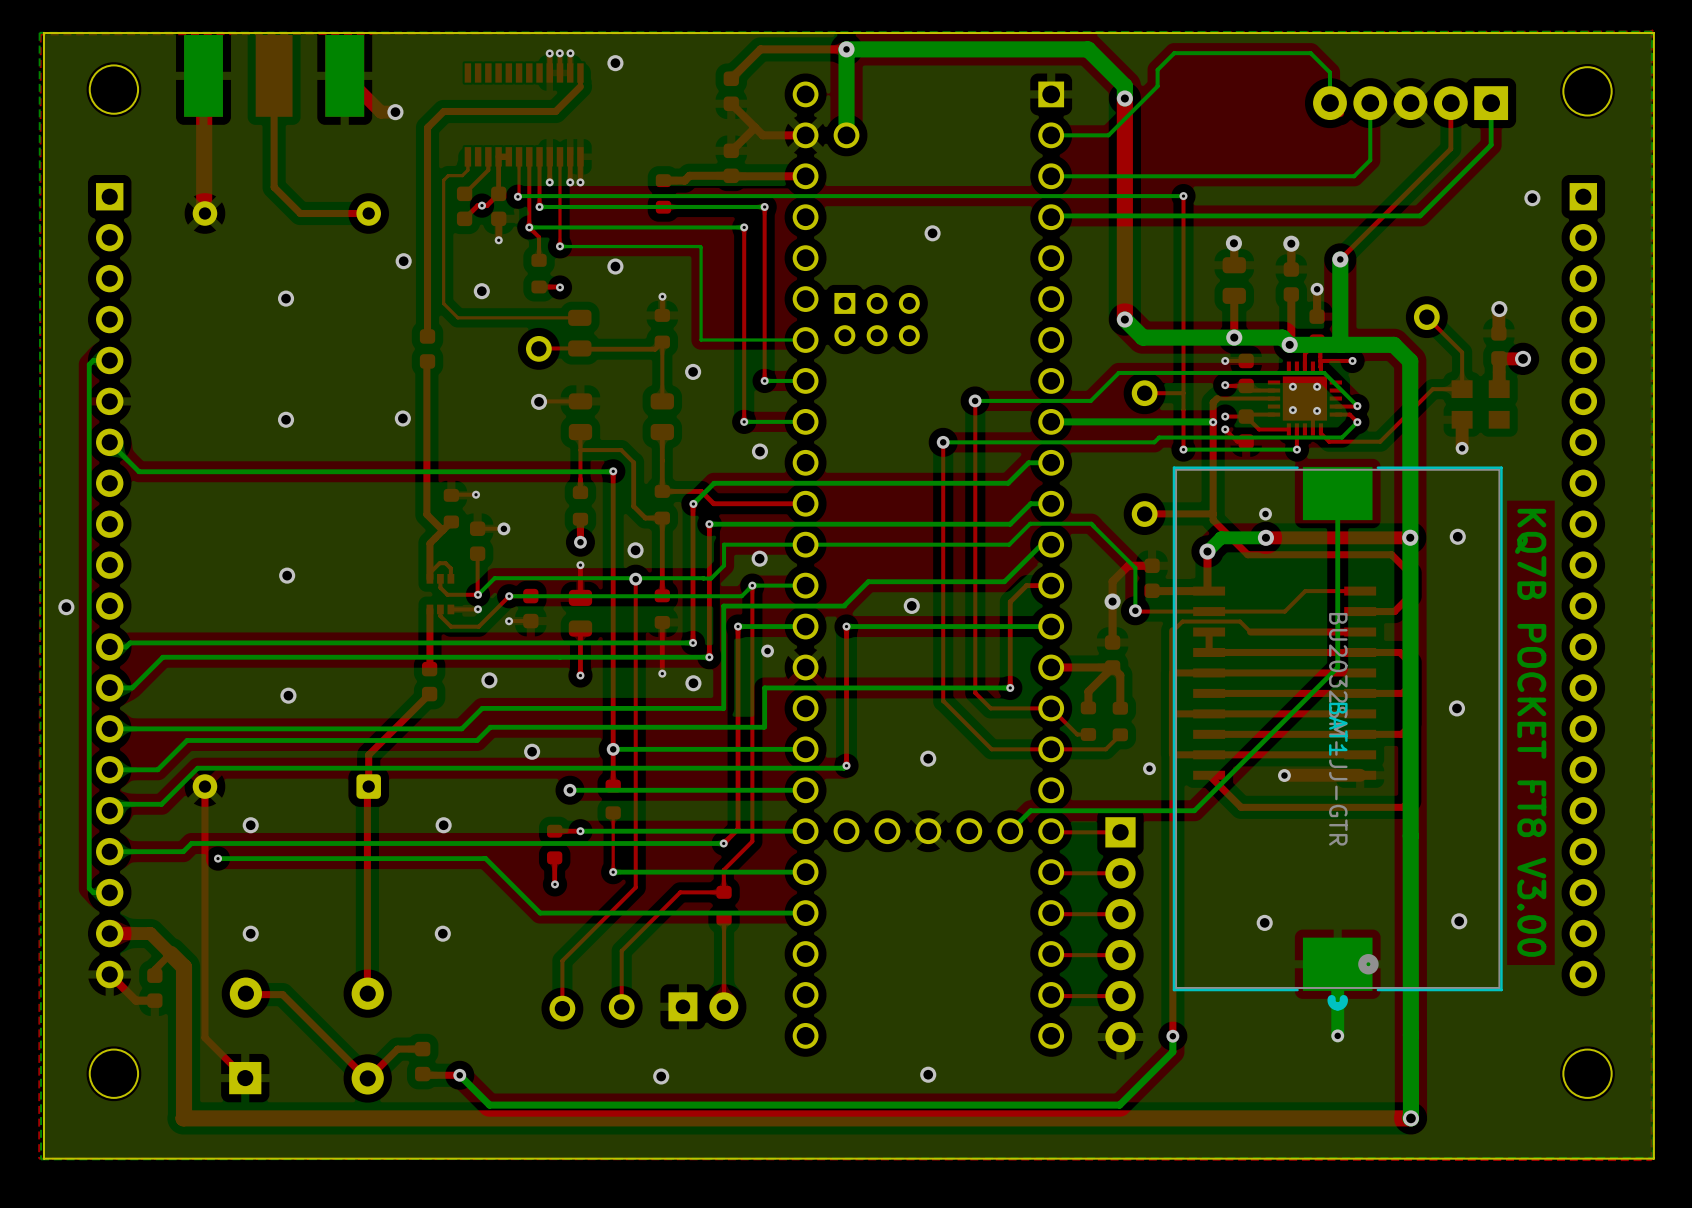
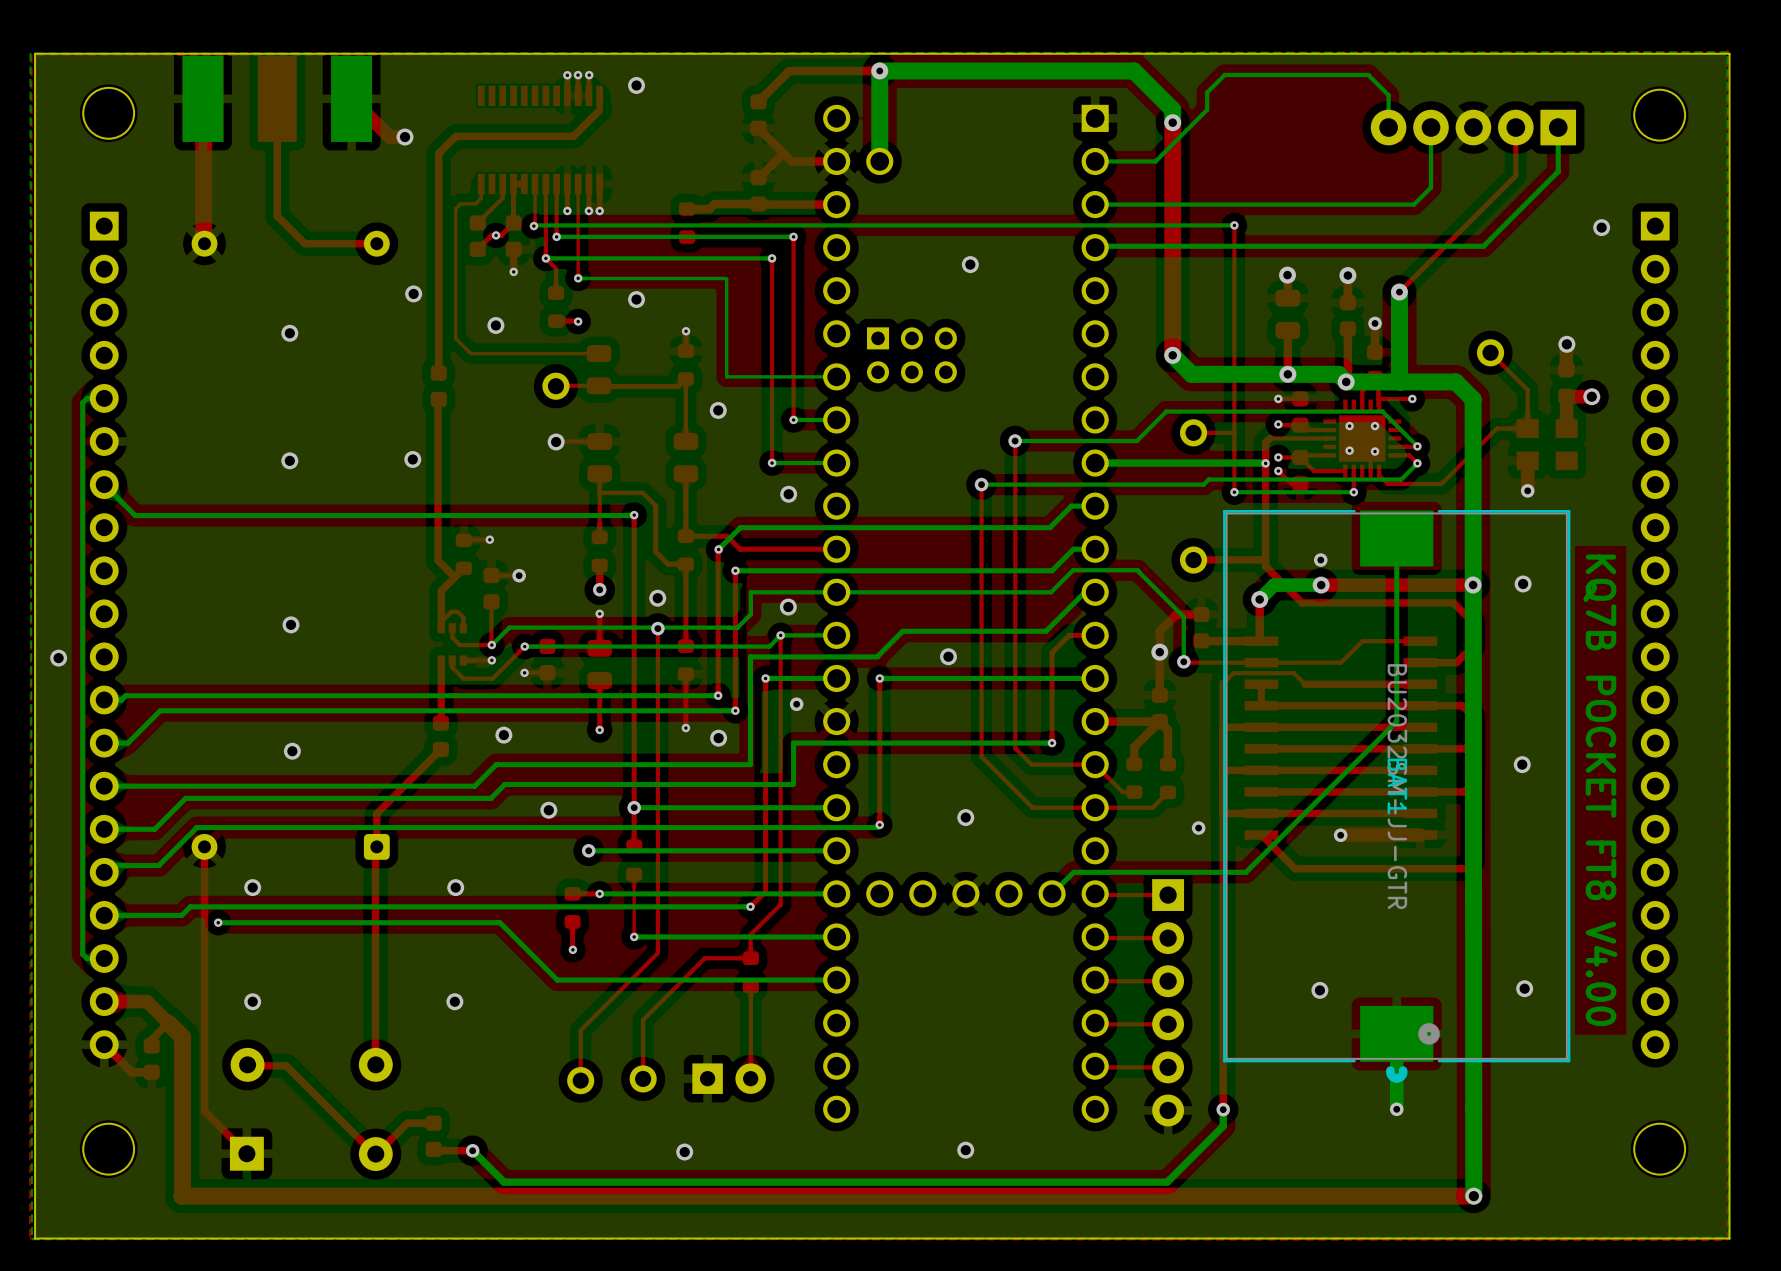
text: KQ7B POCKET FT8 V3.00 (1530, 732) -> KQ7B POCKET FT8 V4.00 (1600, 790)

